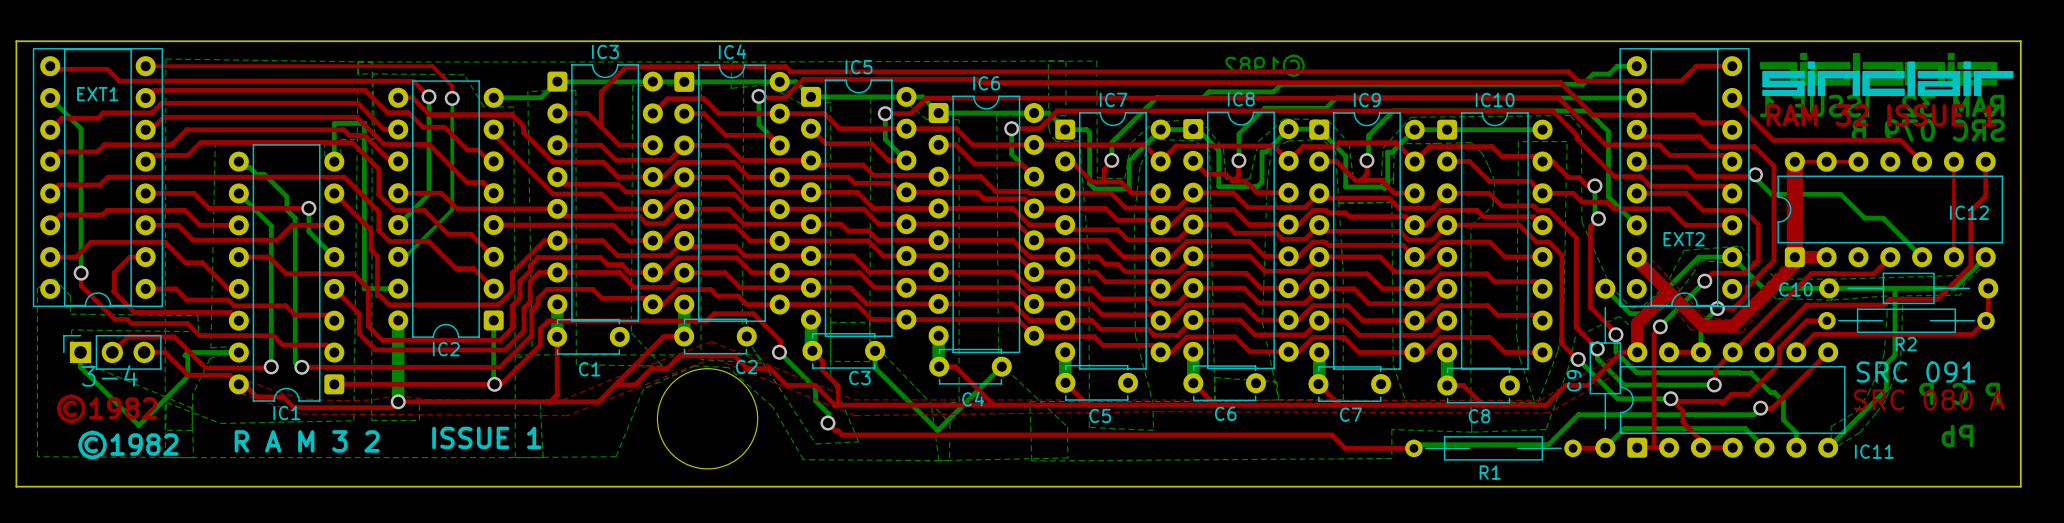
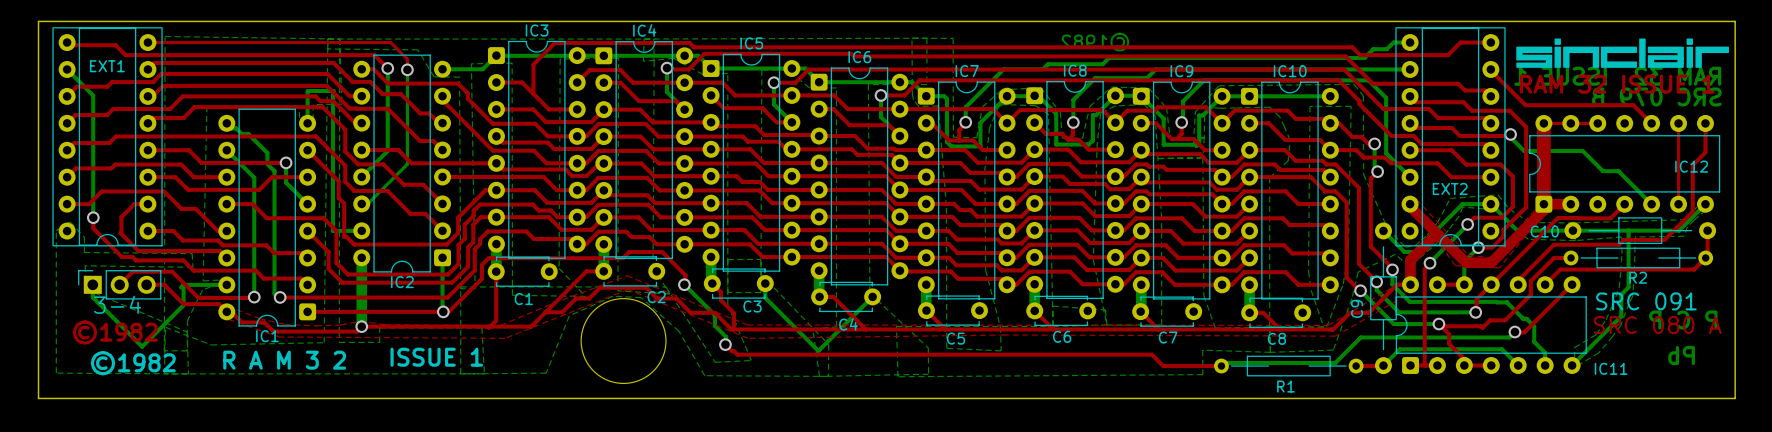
drawing: [1759, 52, 1998, 86] -> none

